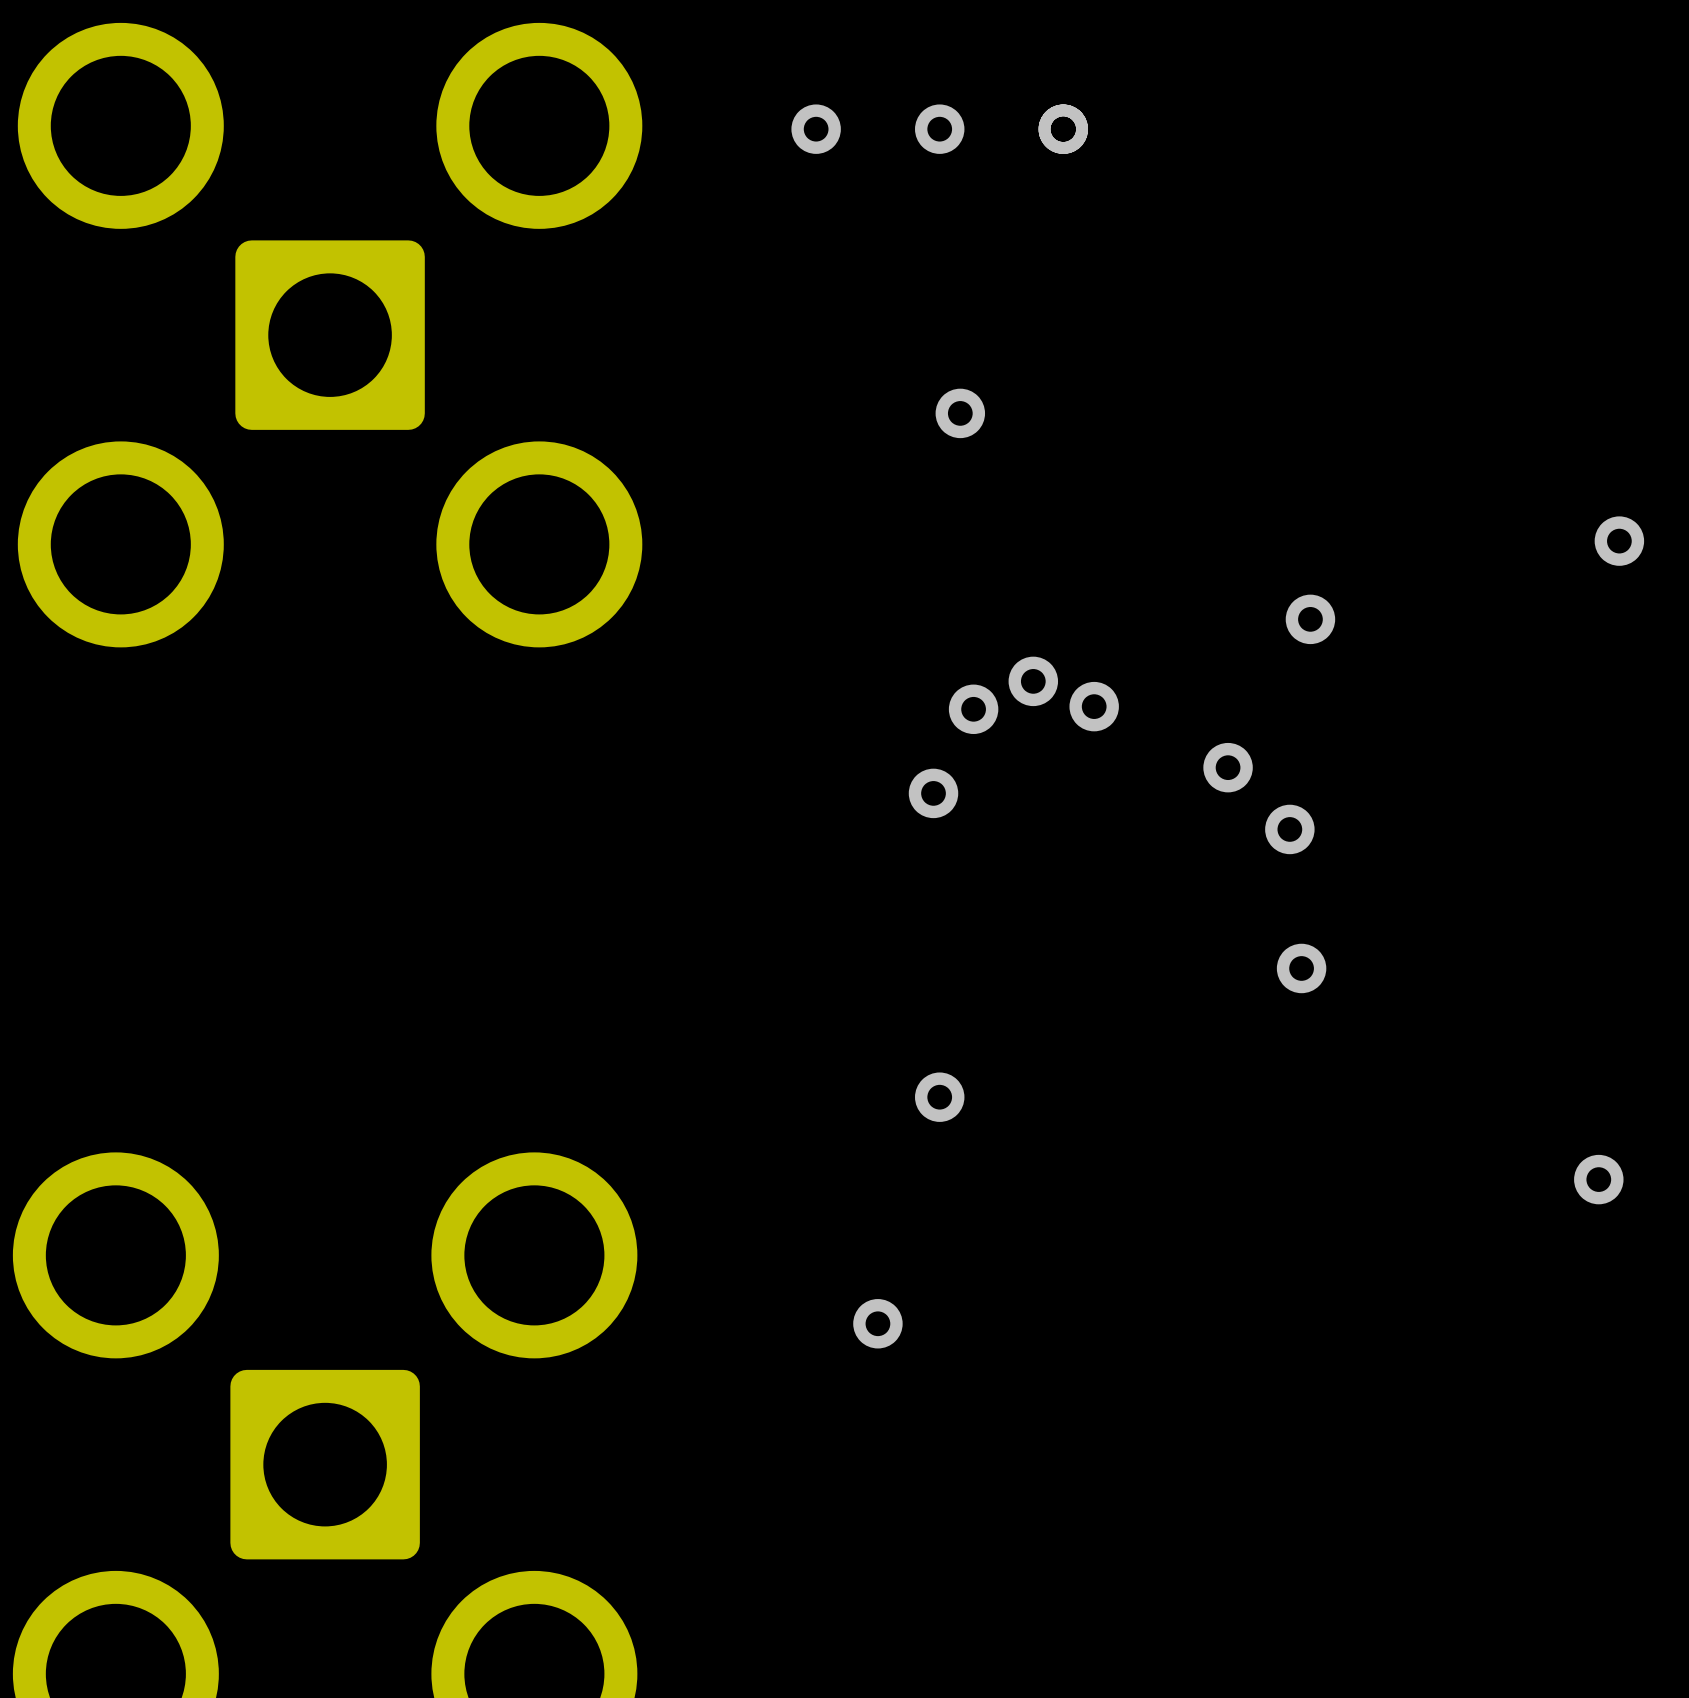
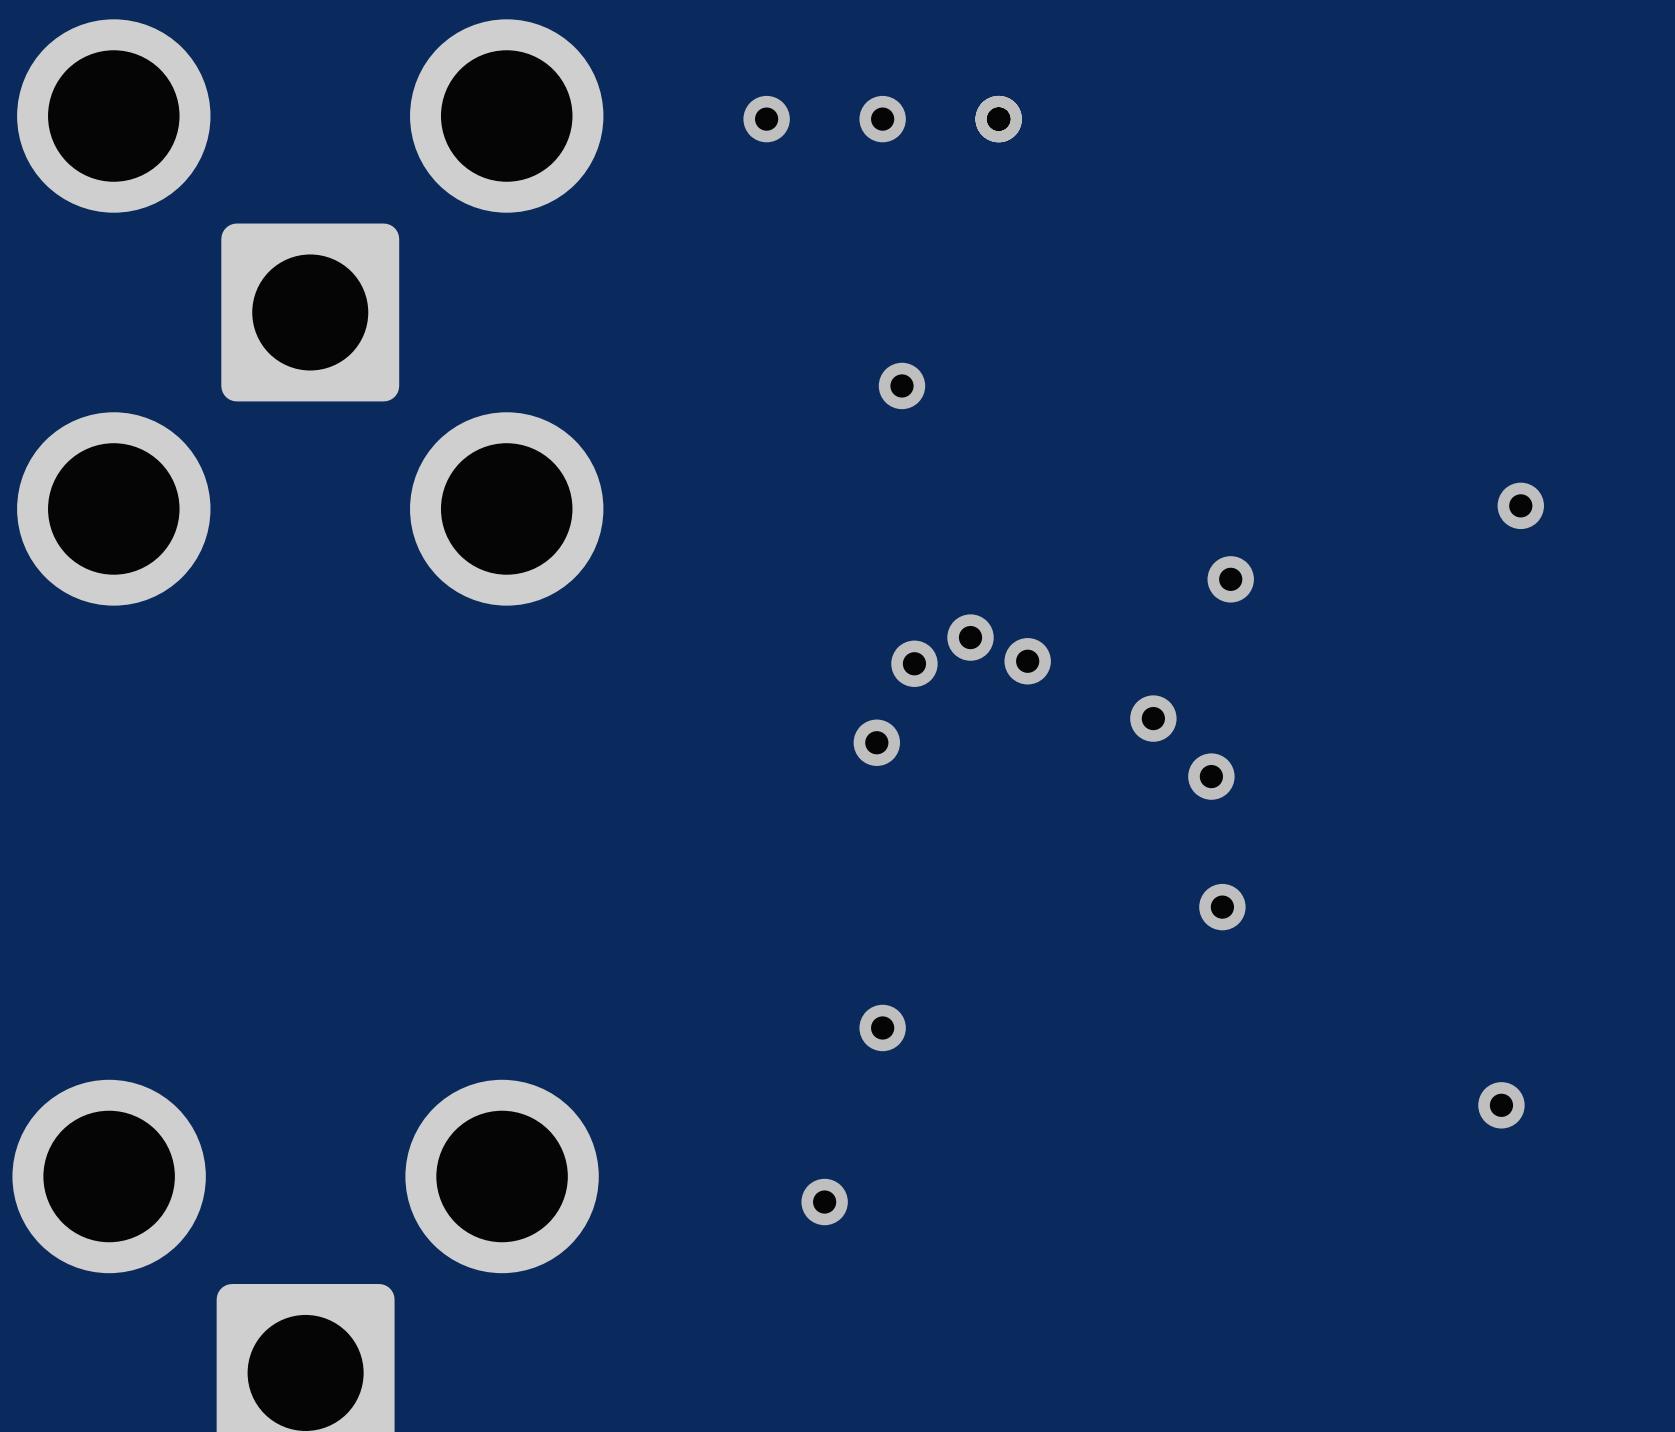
via position: (877, 1323) -> (824, 1202)

